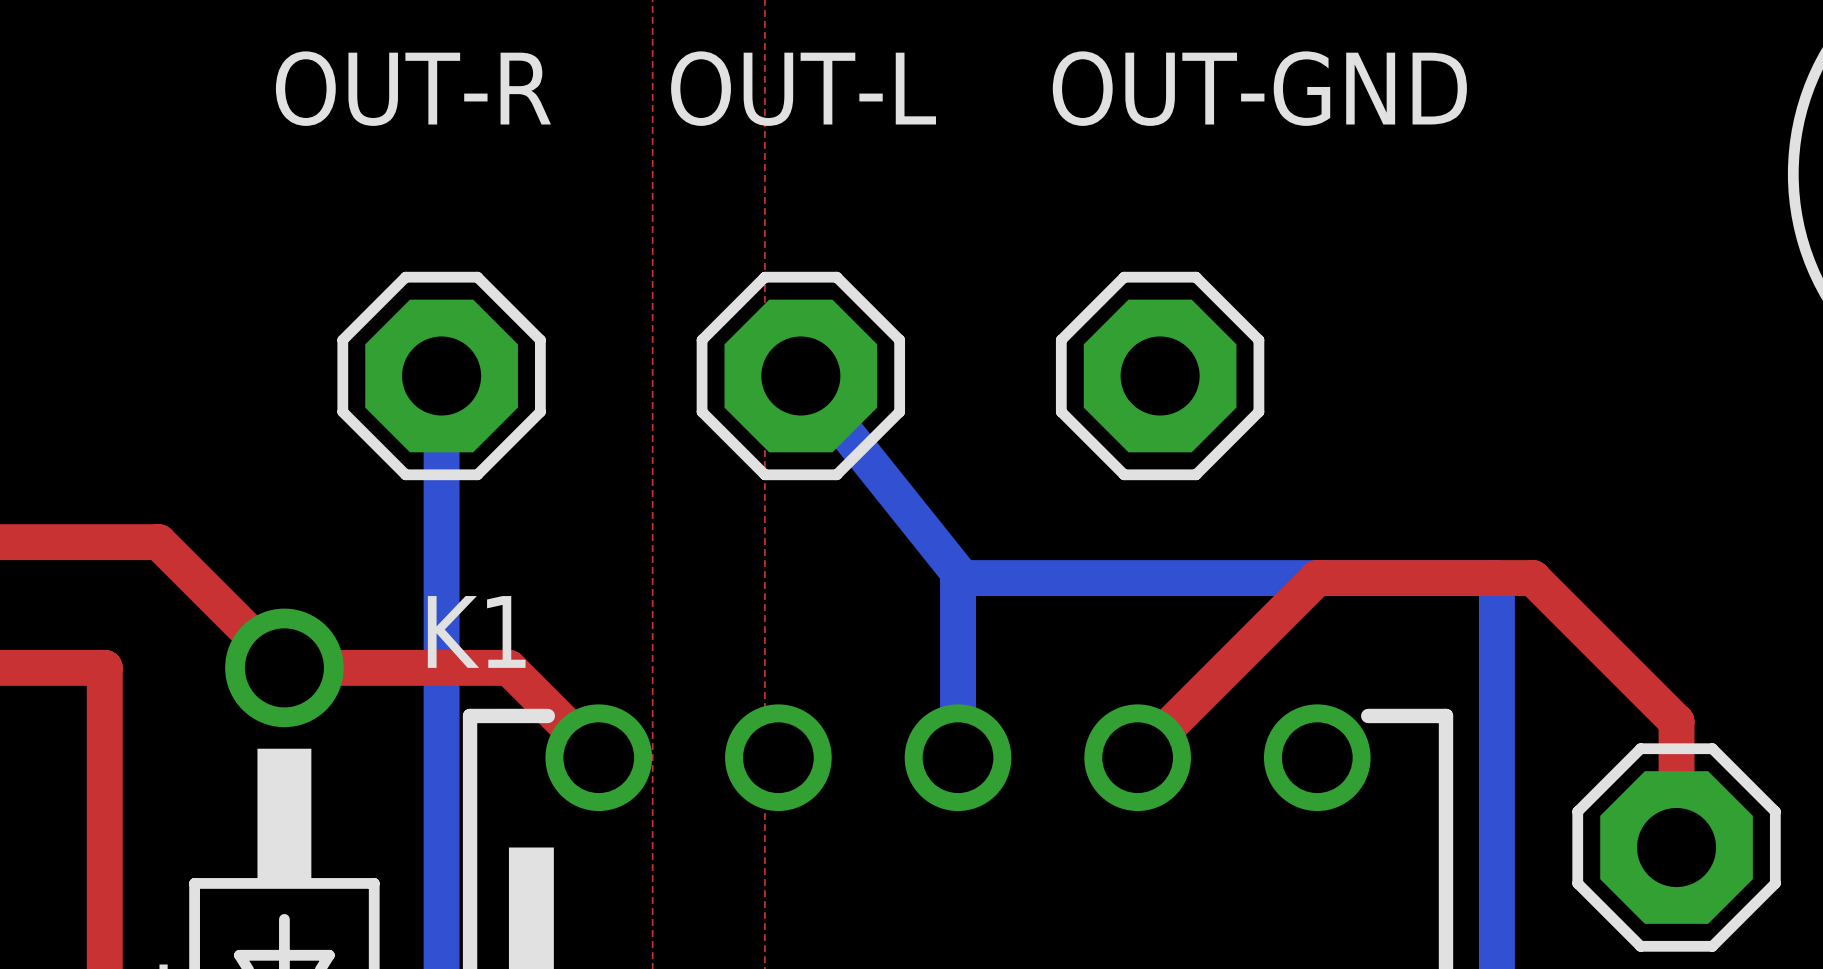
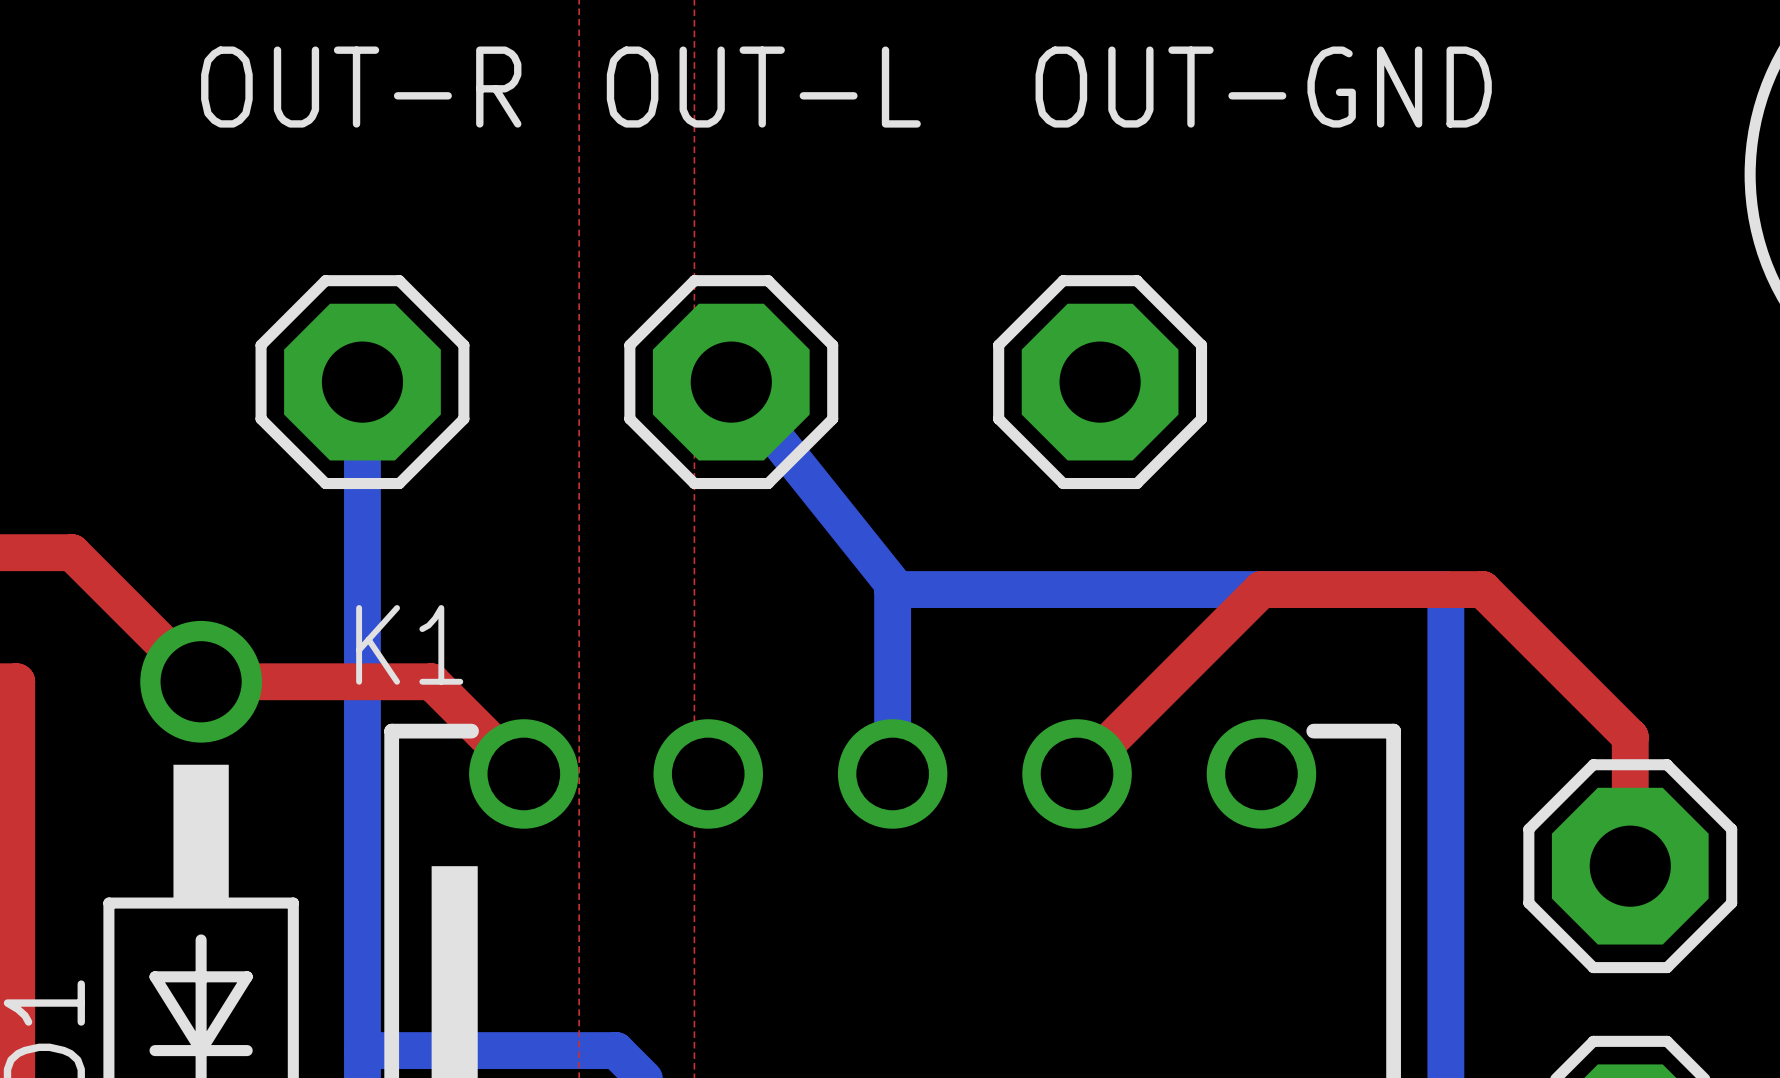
OUT-GND name position: OUT-GND (1259, 88) -> OUT-GND (1263, 87)

